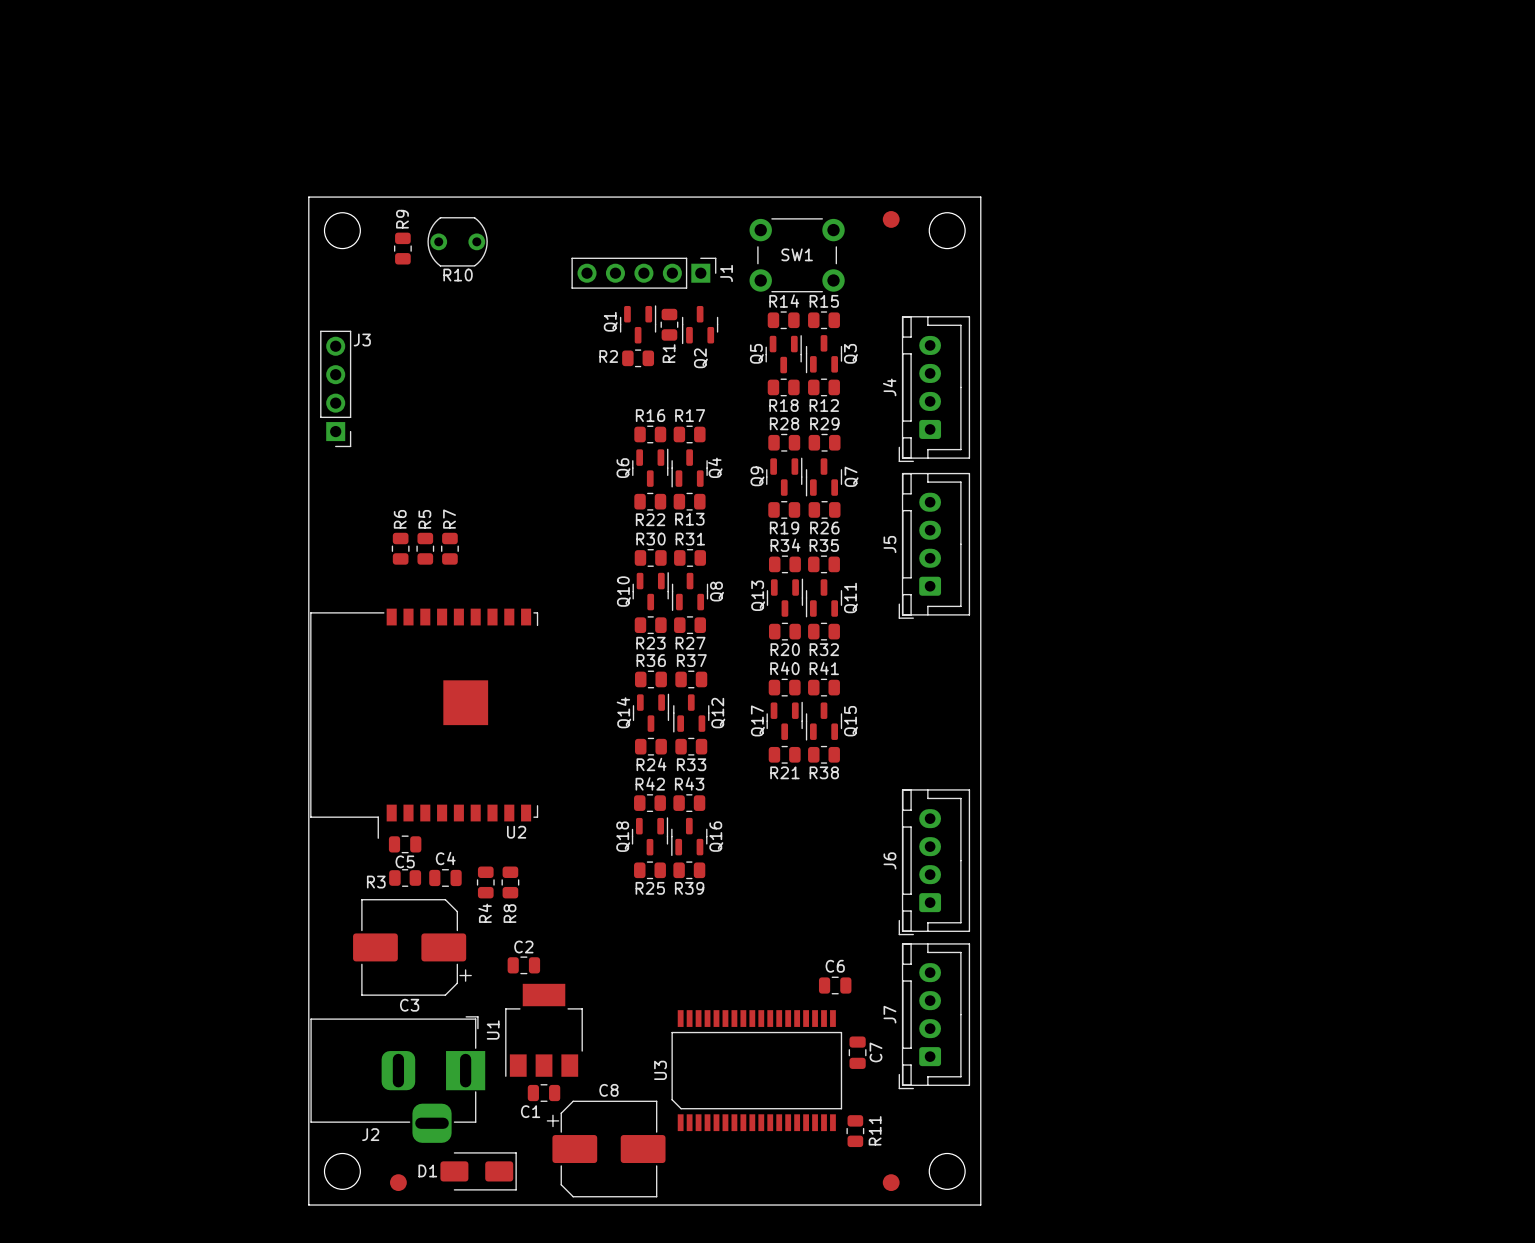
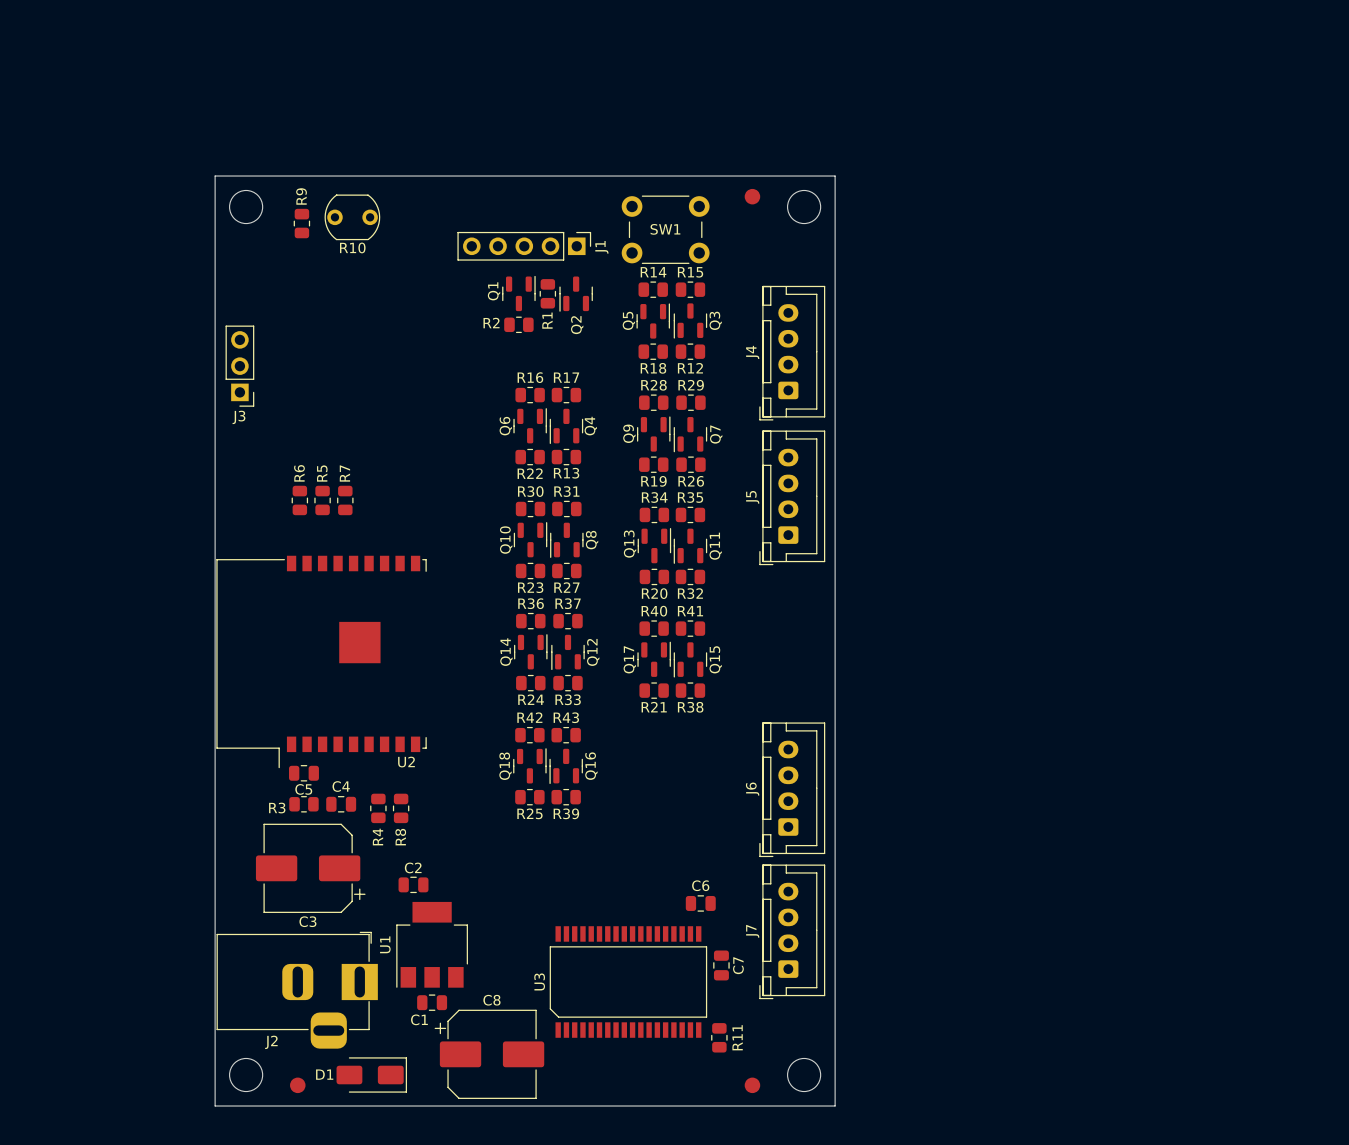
J3 footprint: [320, 330, 352, 448] -> [225, 325, 255, 407]
J3 name position: J3 (362, 339) -> J3 (238, 417)

